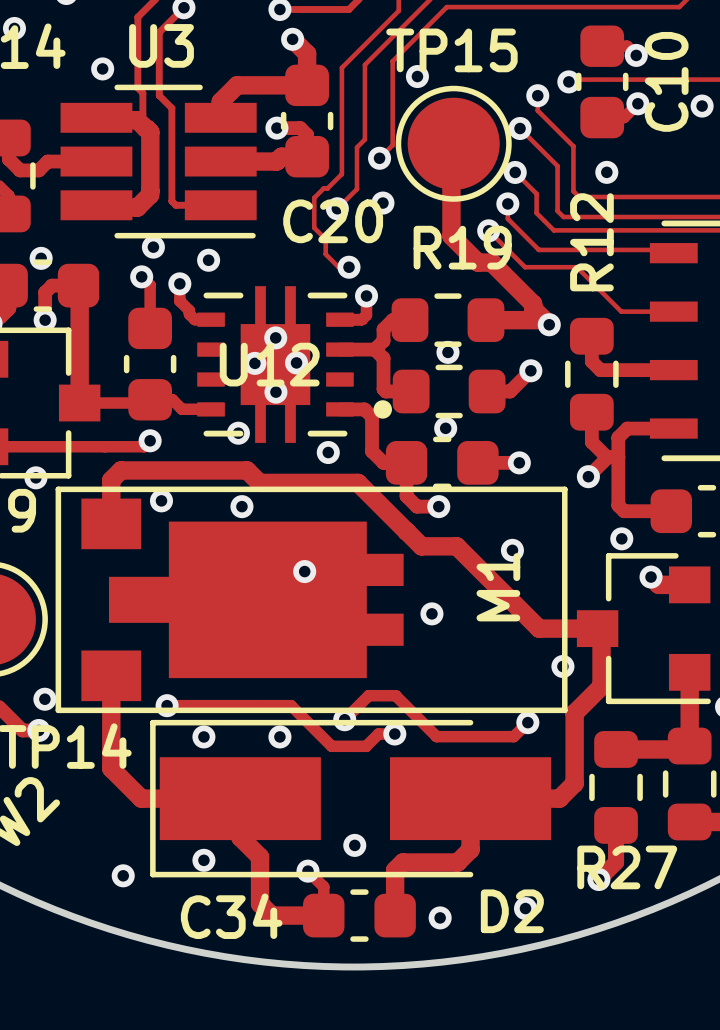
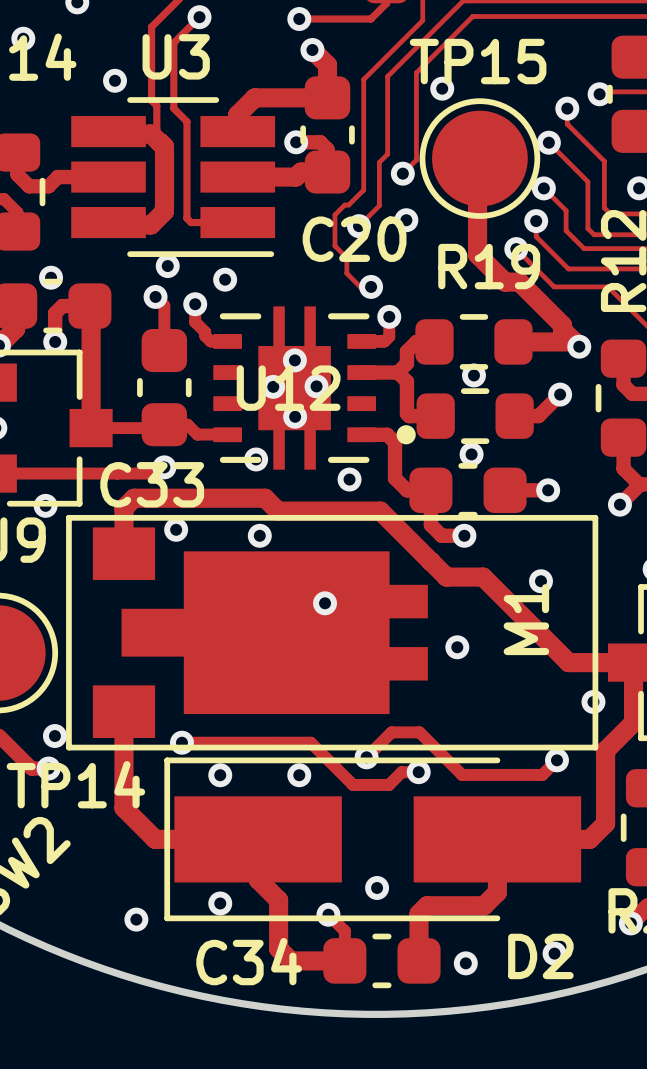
C33 name: none -> C33 (152, 484)

